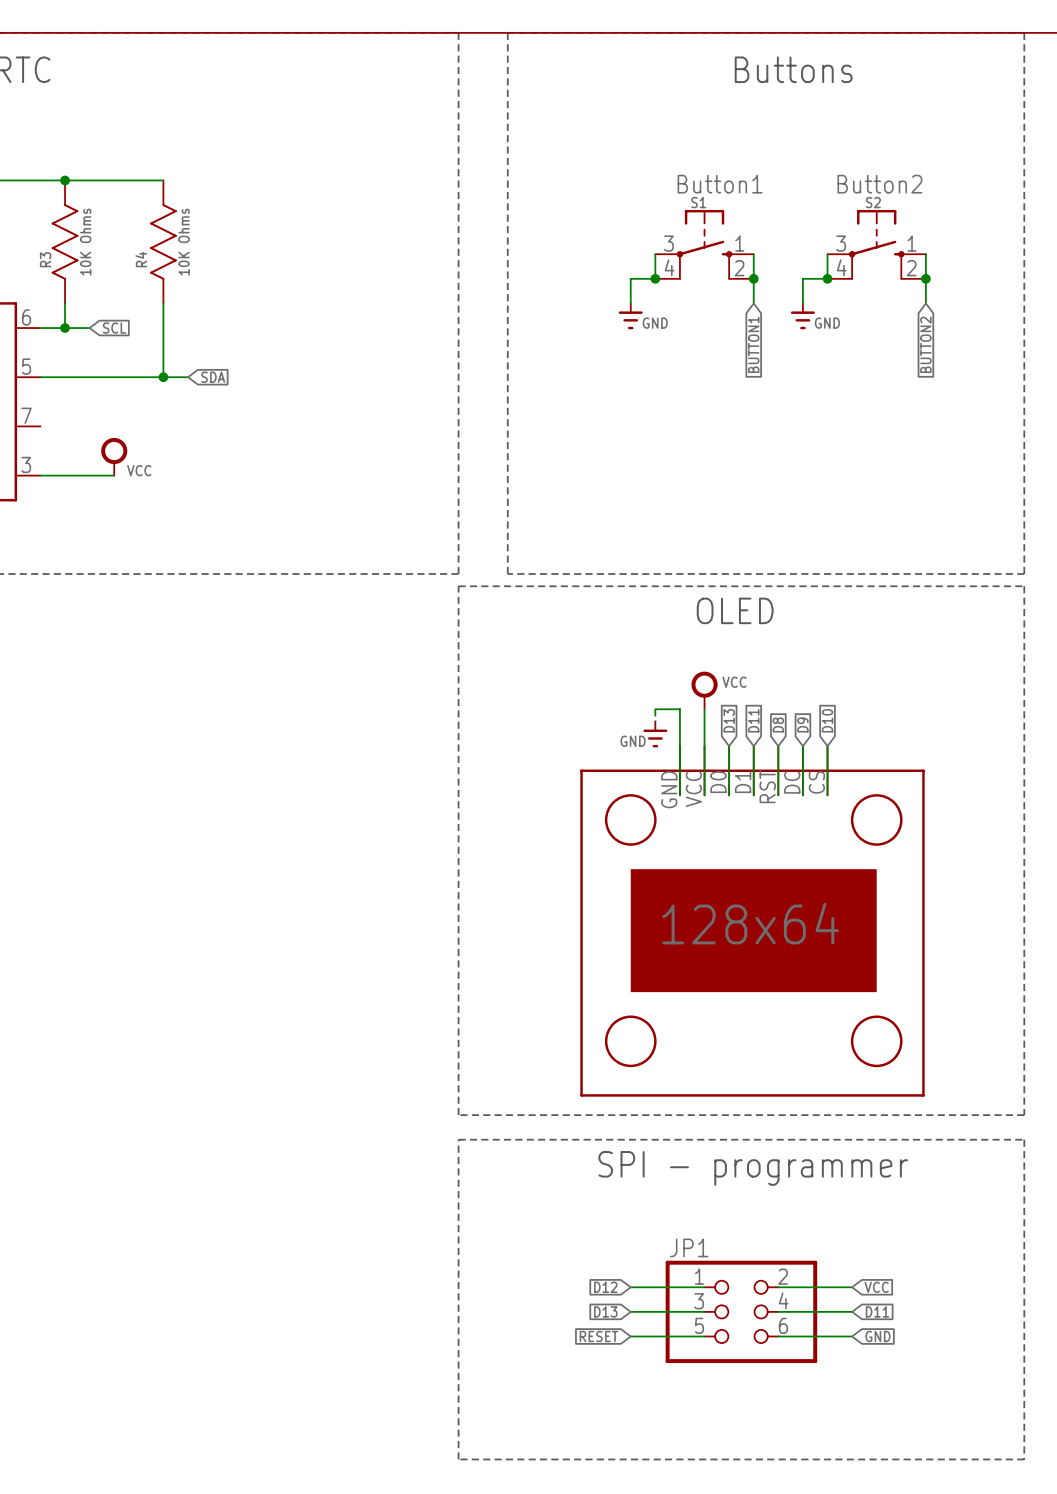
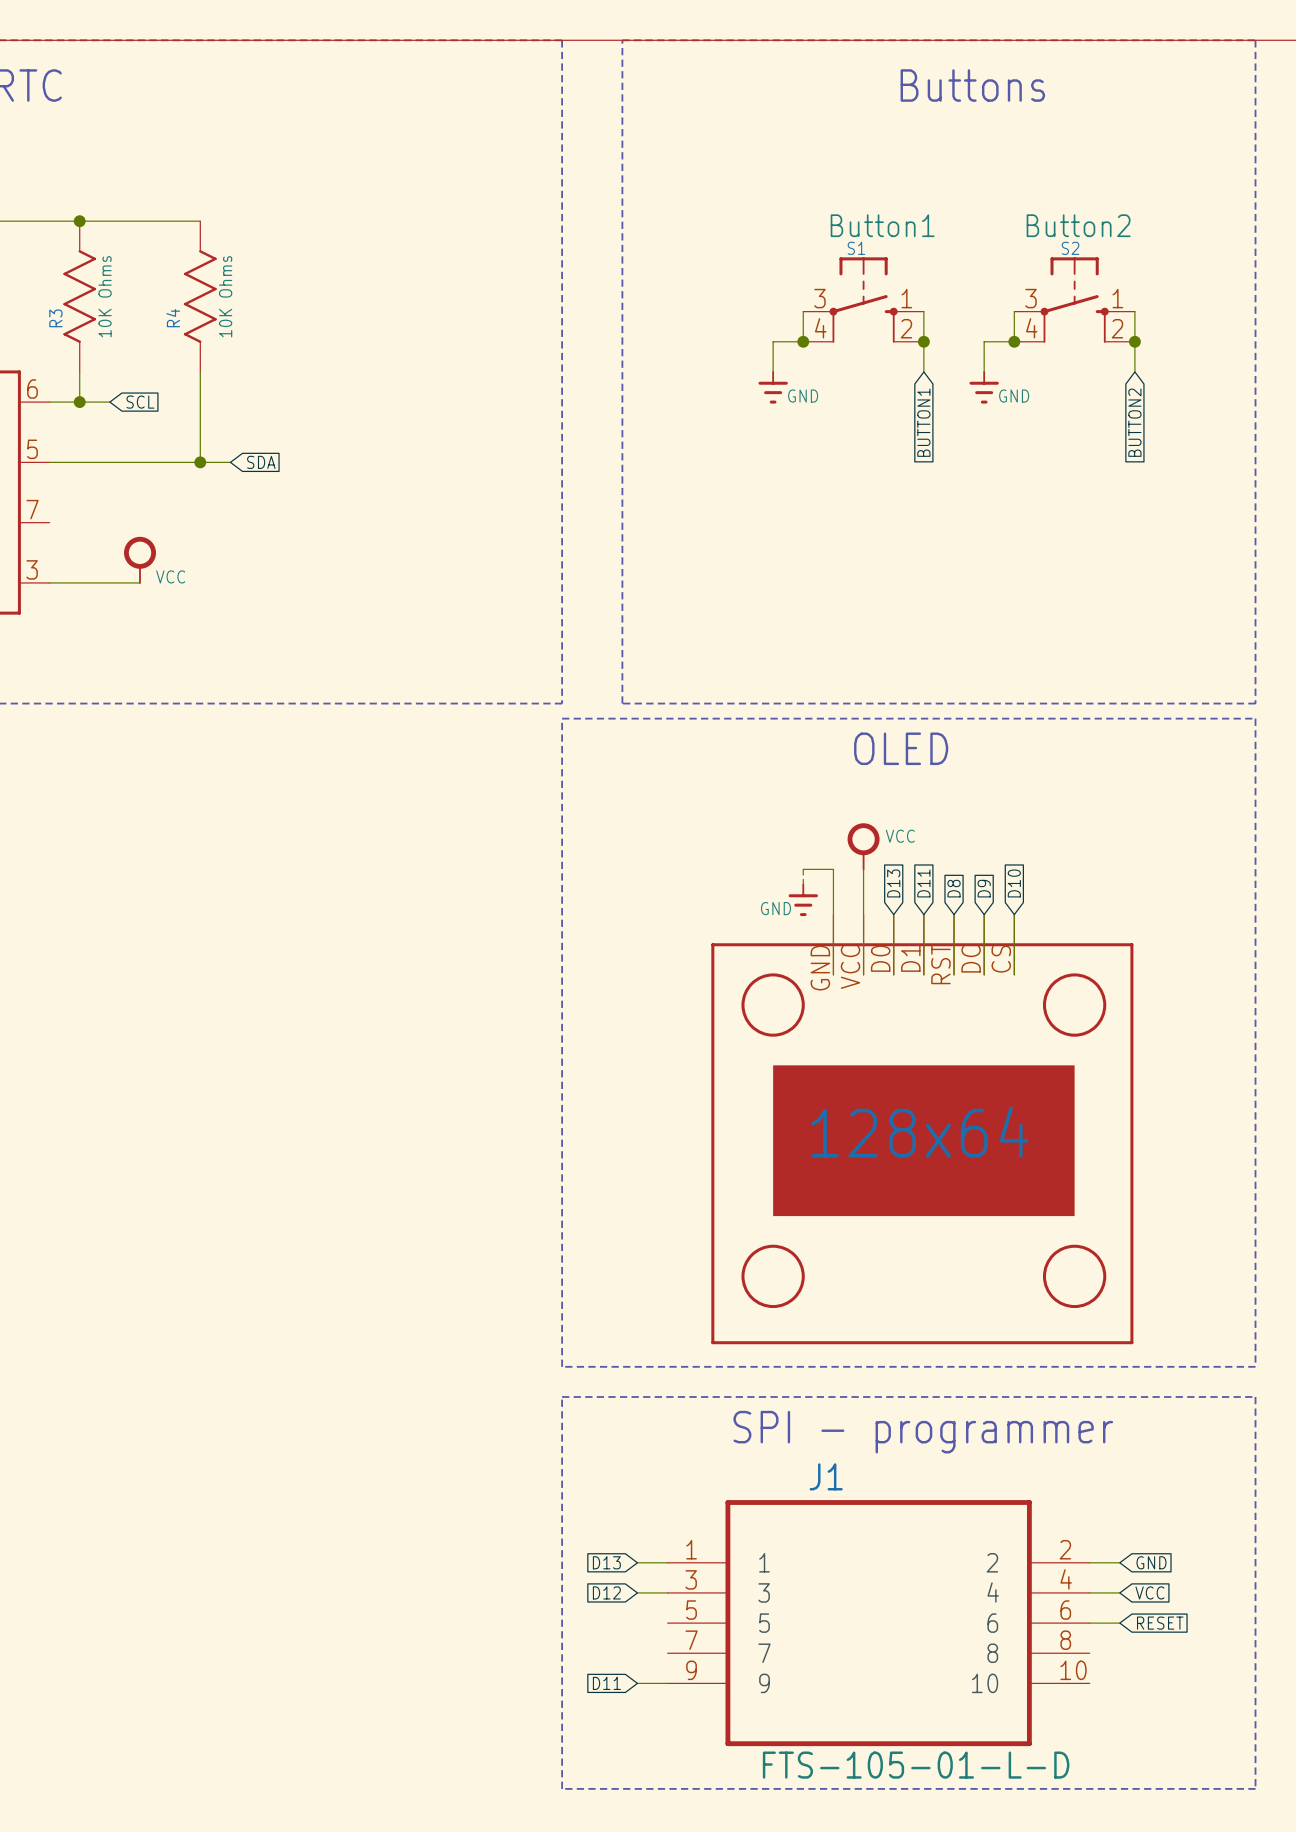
wire: none -> (637, 1562) (667, 1562)
wire: none -> (1089, 1562) (1119, 1562)
global label position: D12 (605, 1287) -> D12 (606, 1592)
wire: (630, 1287) (704, 1287) -> none
wire: (778, 1287) (852, 1287) -> none
global label position: VCC (876, 1287) -> VCC (1149, 1592)
wire: none -> (637, 1592) (667, 1592)
wire: none -> (1089, 1592) (1119, 1592)
global label position: D13 (605, 1311) -> D13 (606, 1562)
wire: (630, 1311) (704, 1311) -> none
JP1: (741, 1311) -> none
wire: (778, 1311) (852, 1311) -> none
global label: D11 (877, 1311) -> none
J1: none -> FTS-105-01-L-D (878, 1623)
wire: none -> (1089, 1623) (1119, 1623)
global label: none -> RESET (1160, 1623)
global label: RESET (599, 1336) -> none
wire: (630, 1336) (704, 1336) -> none
wire: (778, 1336) (852, 1336) -> none
global label position: GND (877, 1336) -> GND (1151, 1562)
global label: none -> D11 (606, 1683)
wire: none -> (637, 1683) (667, 1683)

